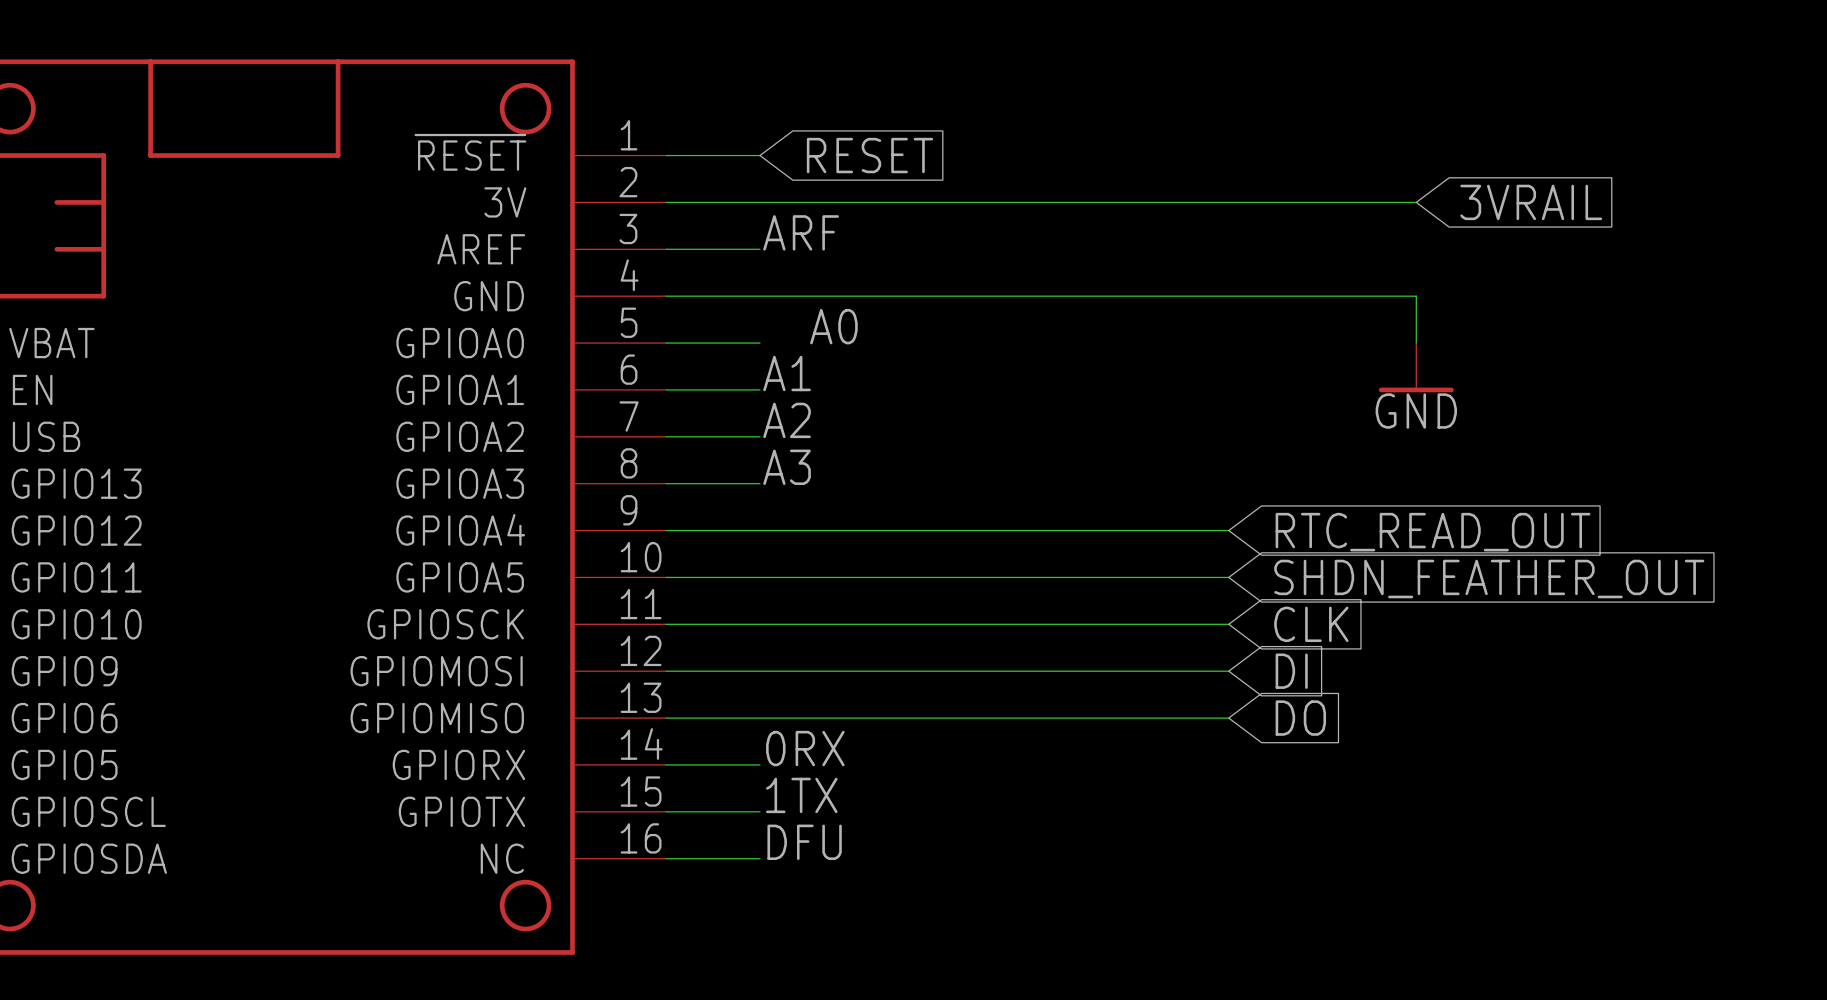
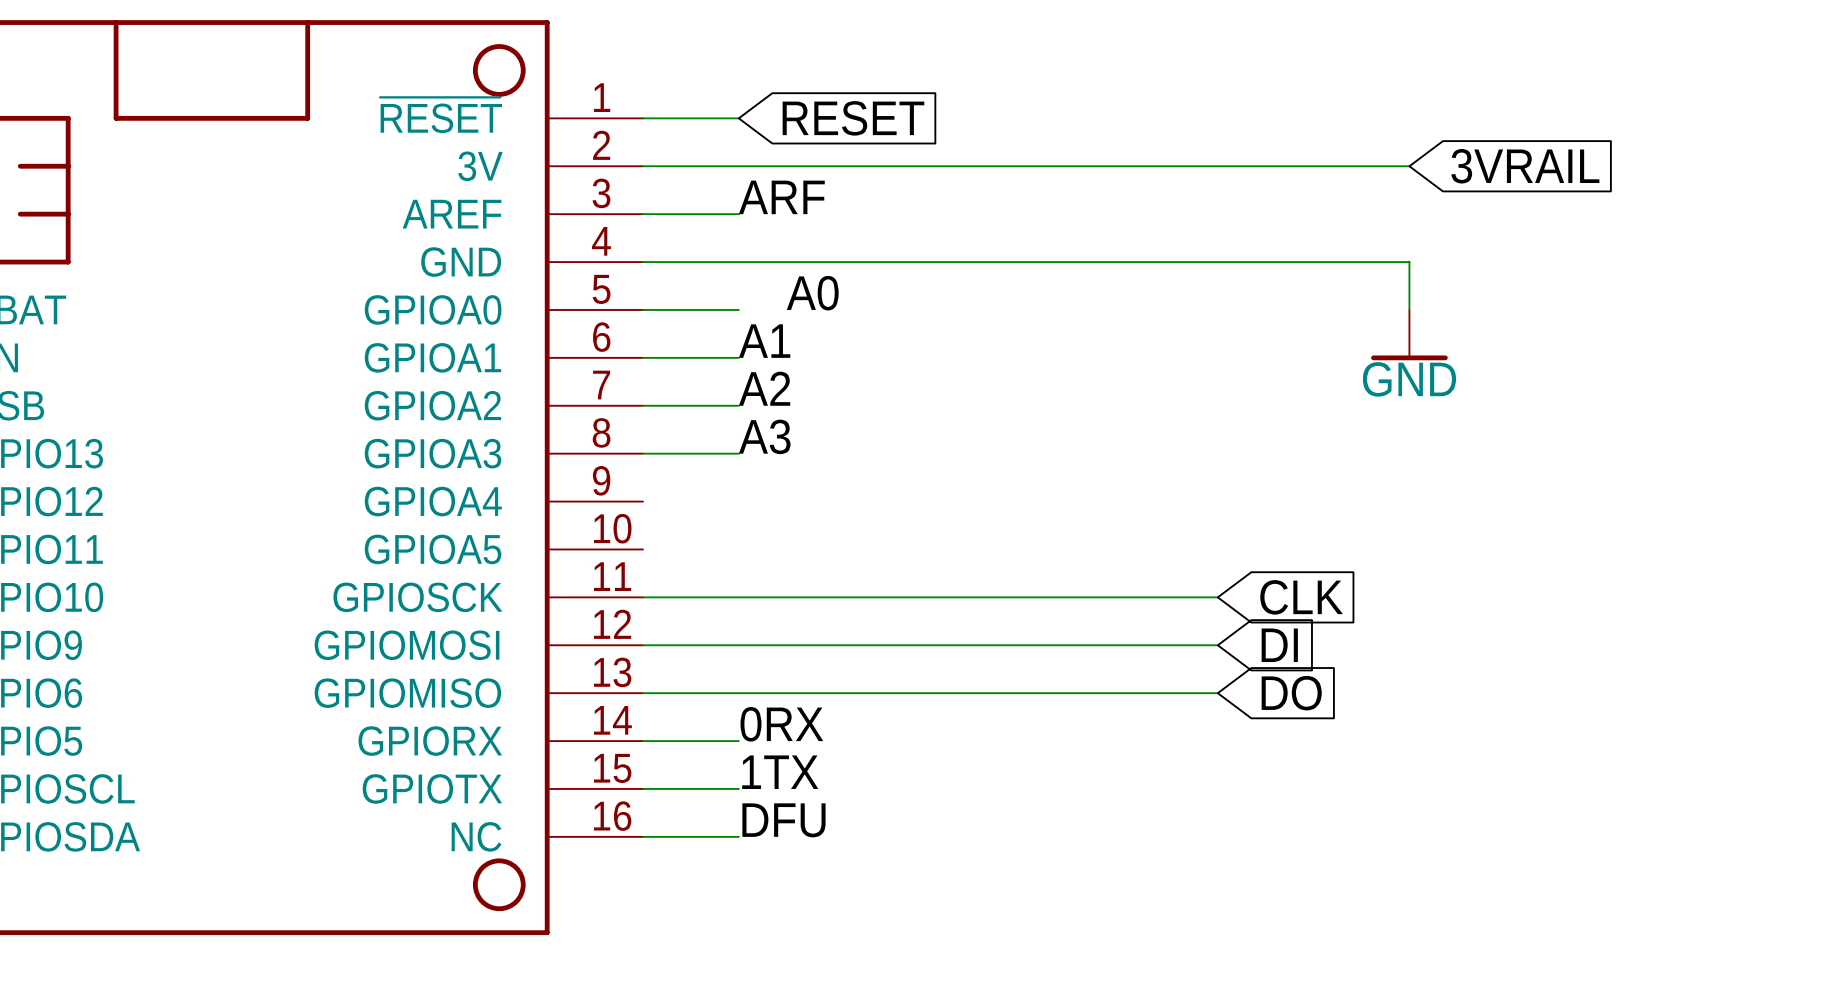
wire: (666, 530) (1228, 530) -> none
global label: RTC_READ_OUT (1433, 532) -> none
wire: (666, 577) (1228, 577) -> none
global label: SHDN_FEATHER_OUT (1489, 579) -> none

